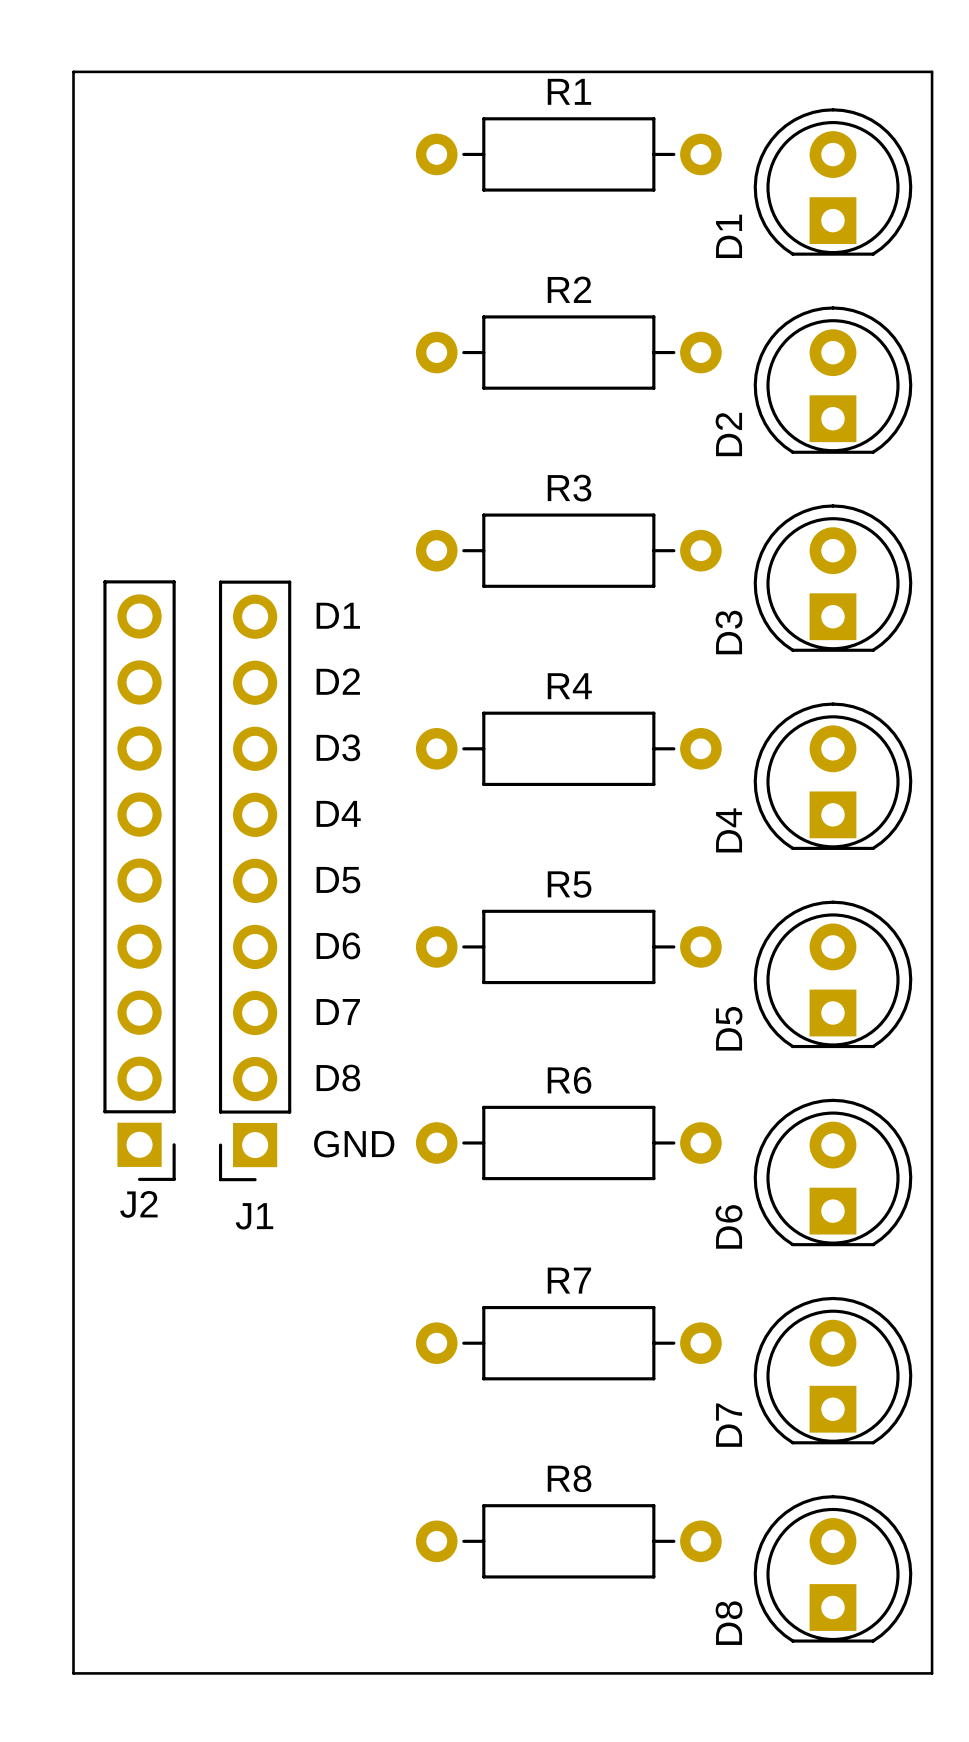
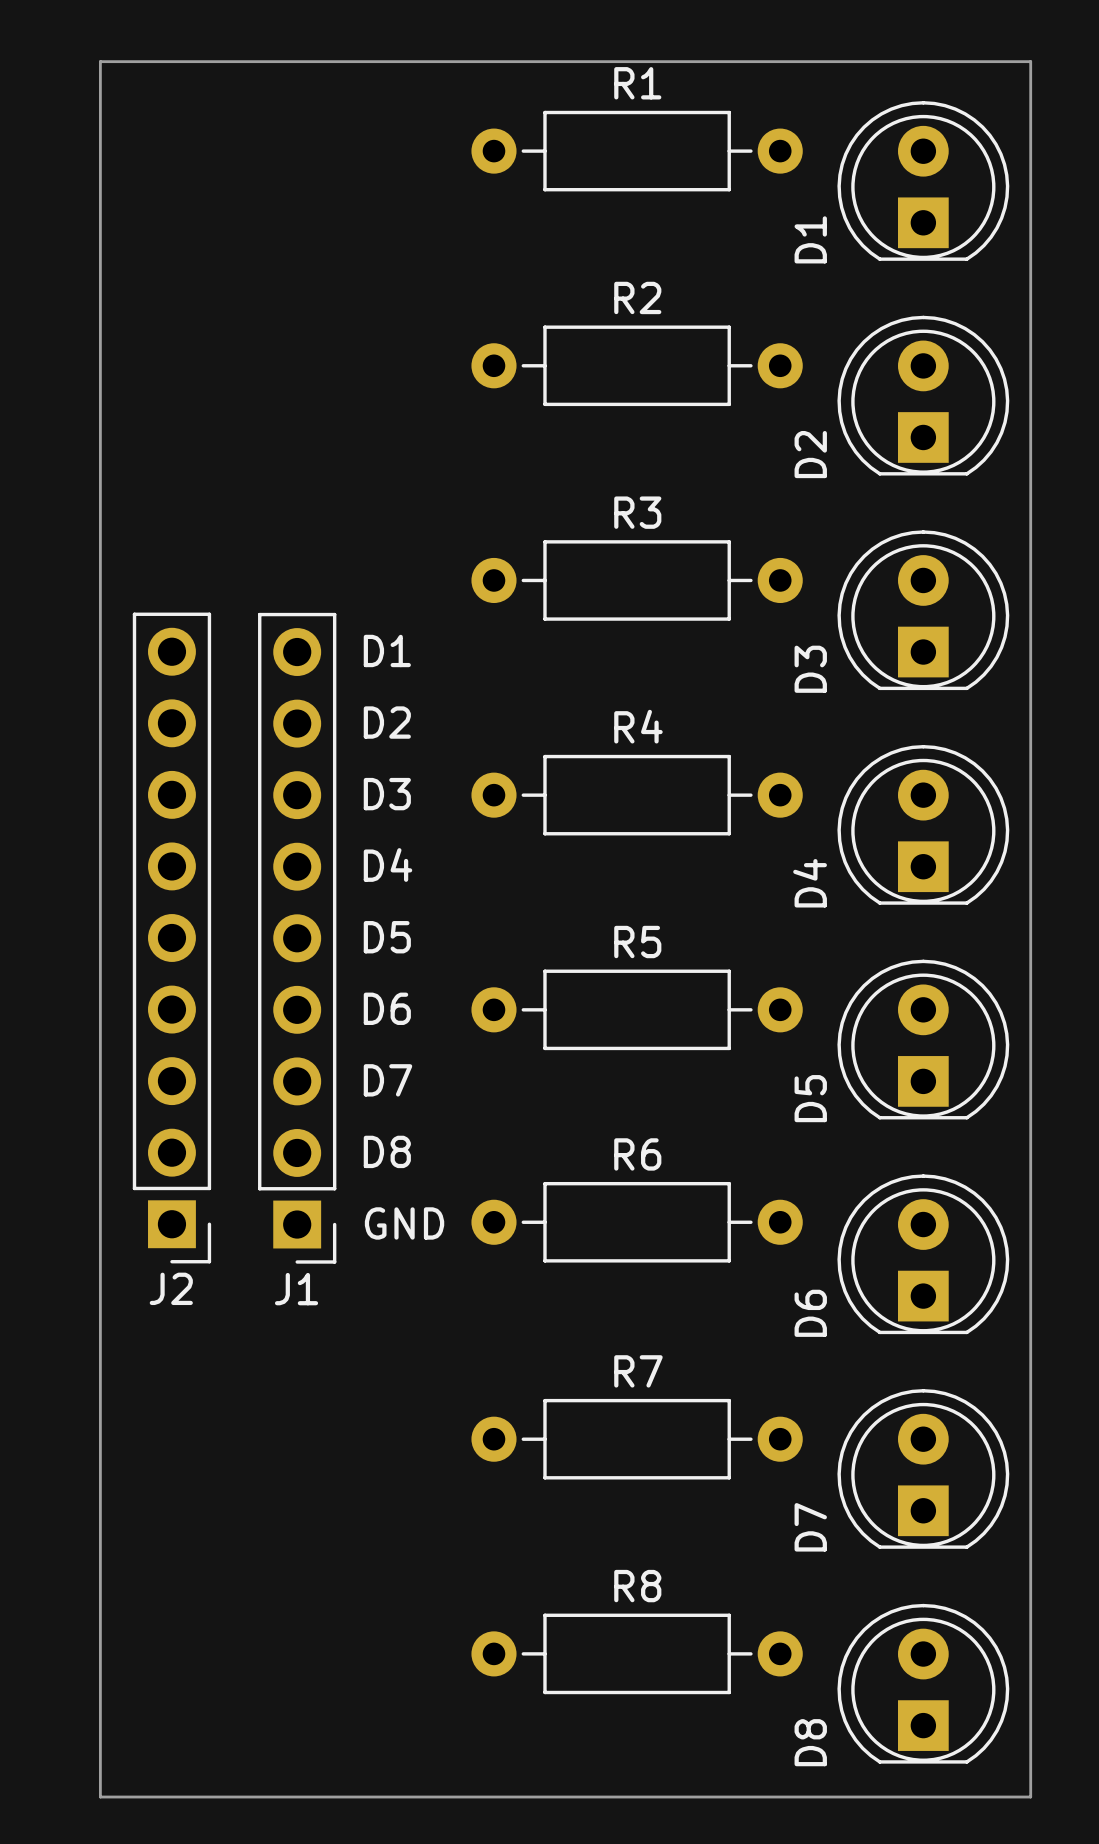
J1 footprint: [218, 580, 292, 1182] -> [258, 612, 337, 1264]

